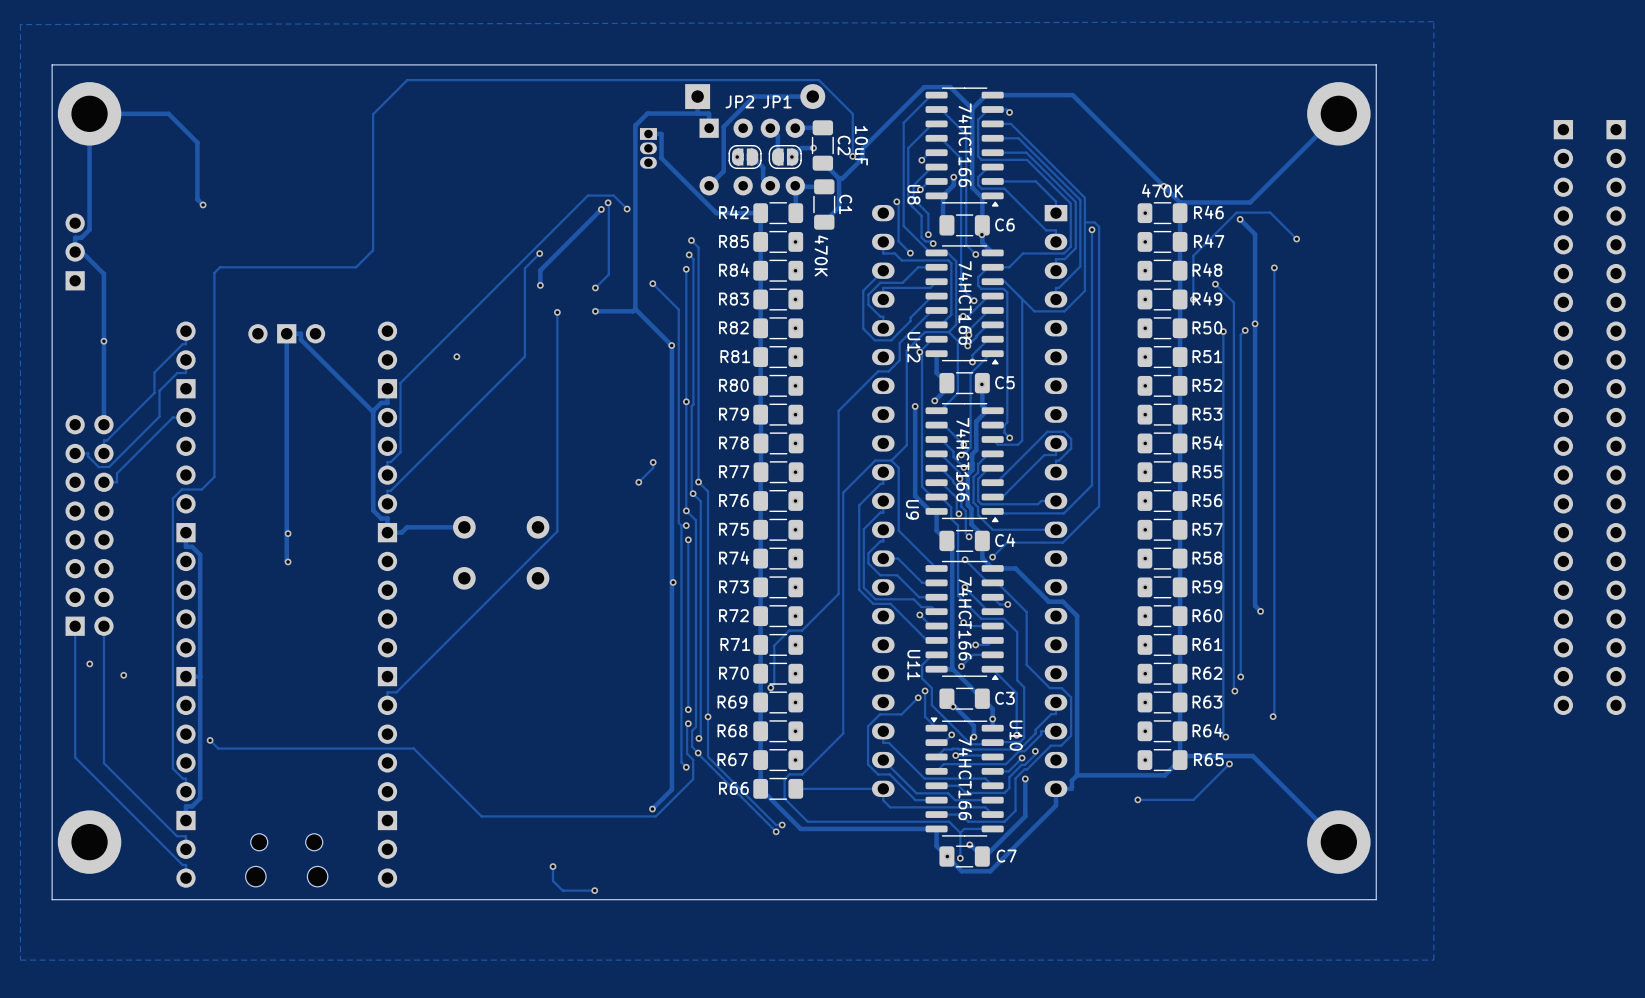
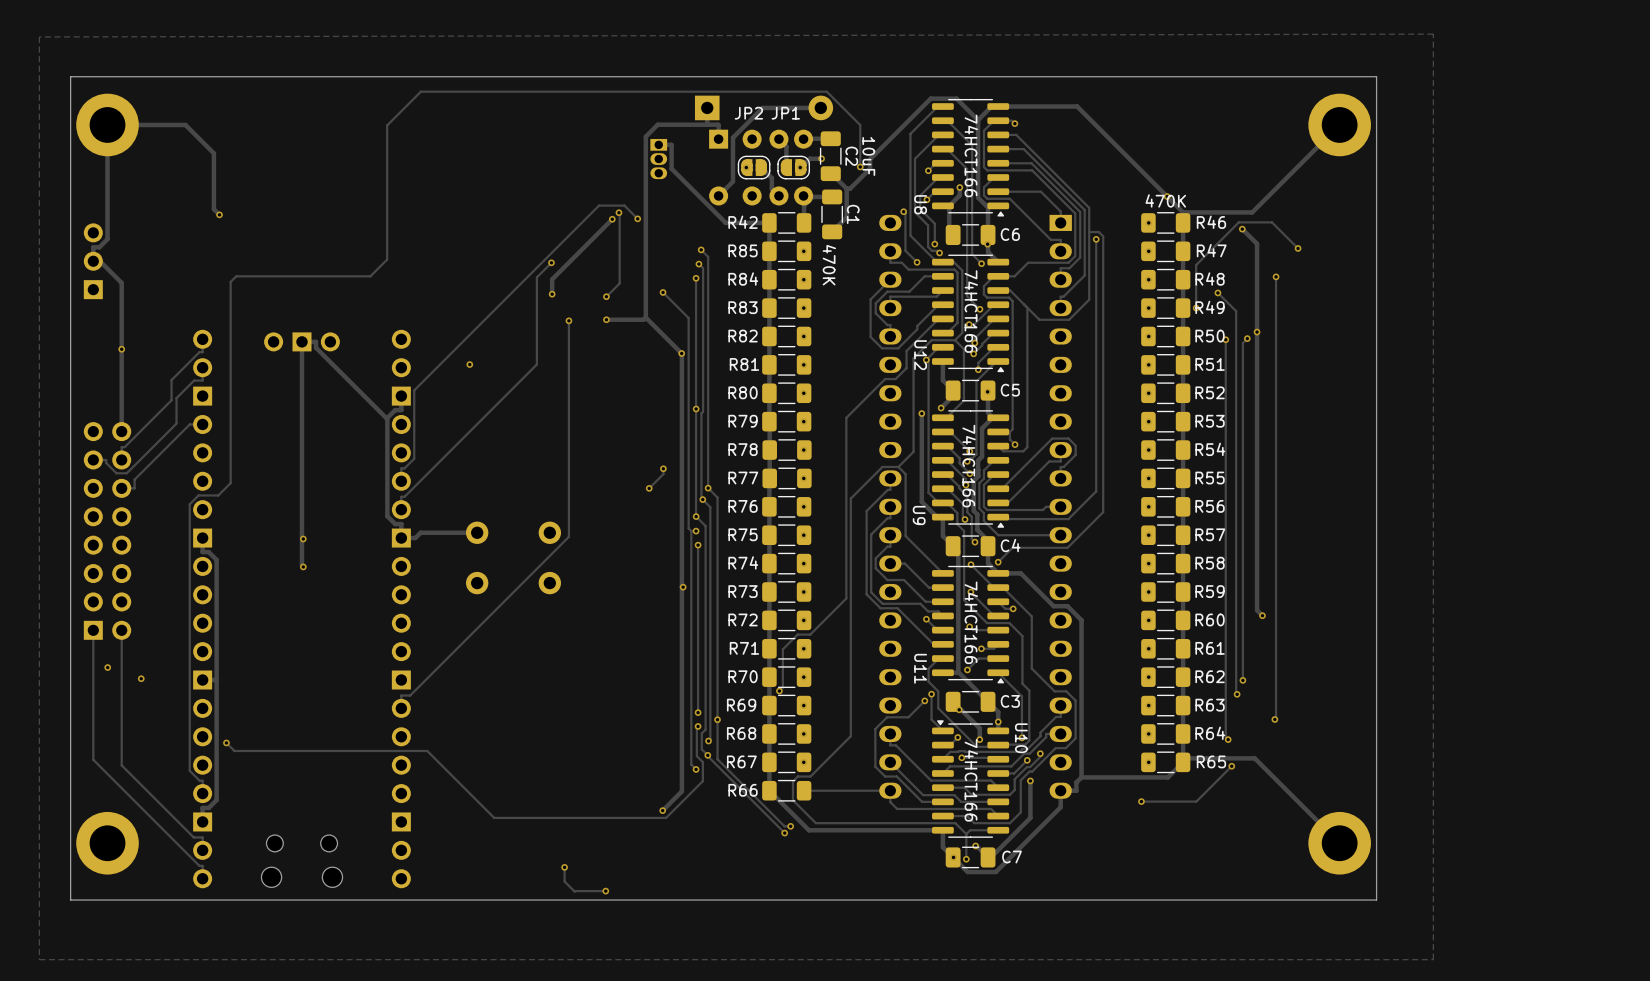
part: (1563, 417) -> none
part: (1616, 417) -> none

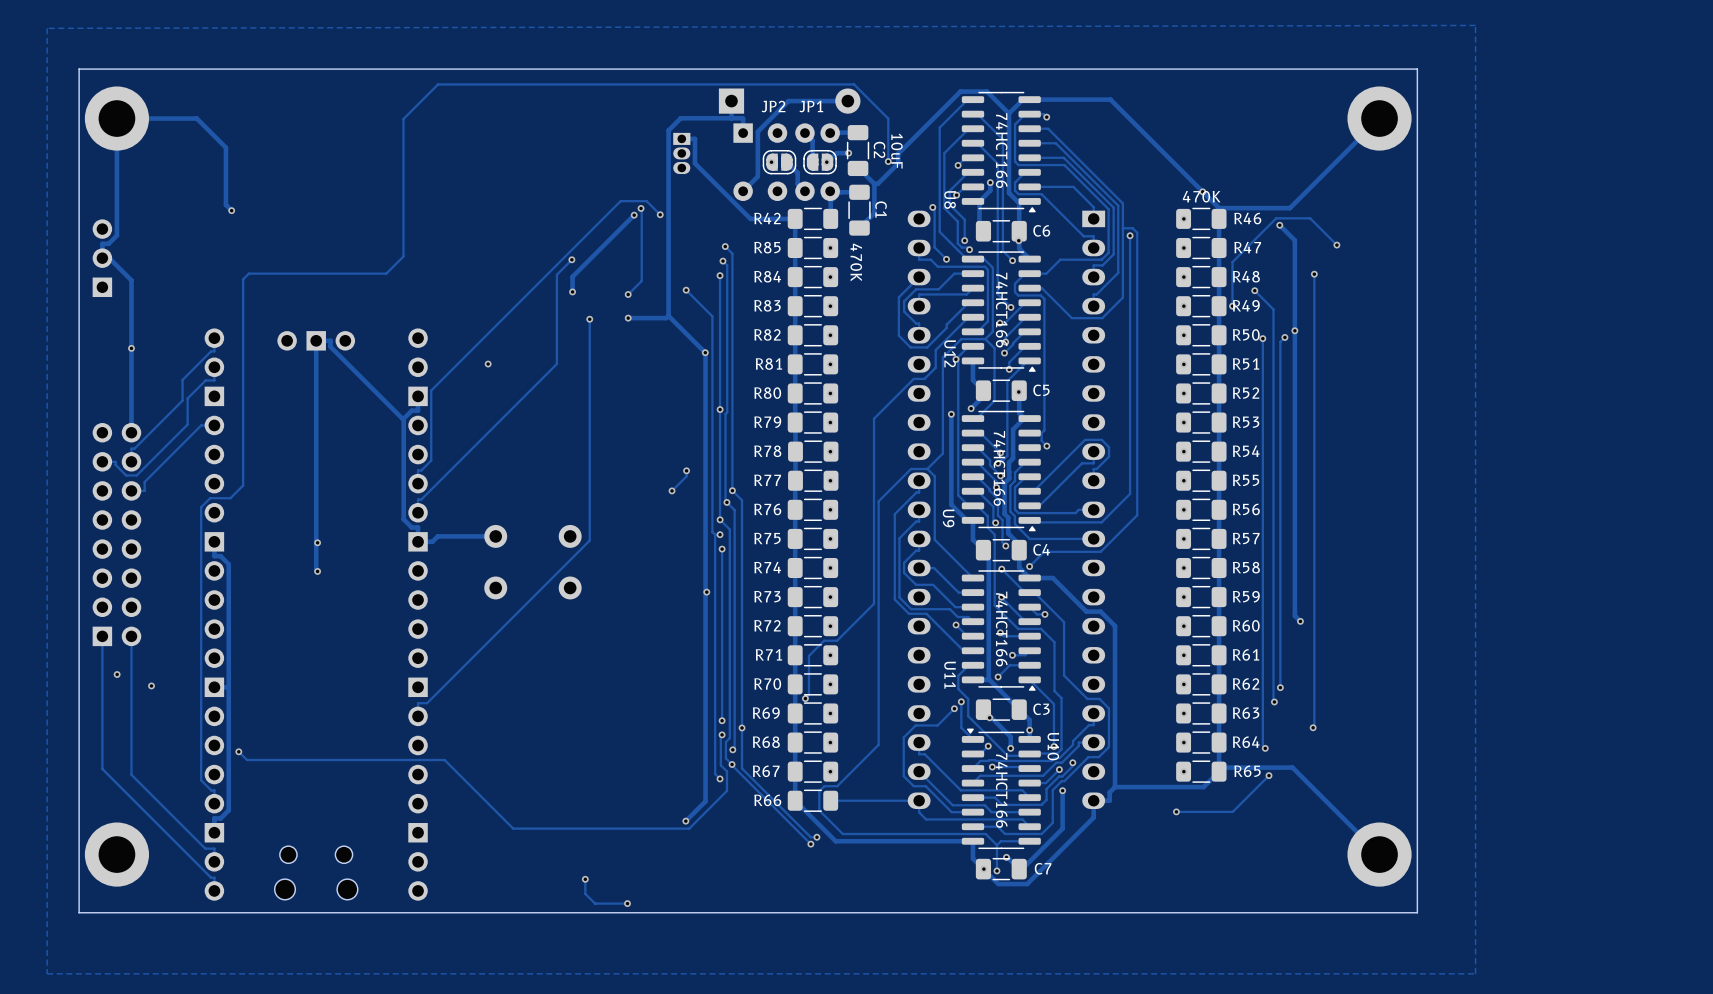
track: (1027, 307) (1027, 447) (1023, 451) (1003, 451) (998, 446) -> none

